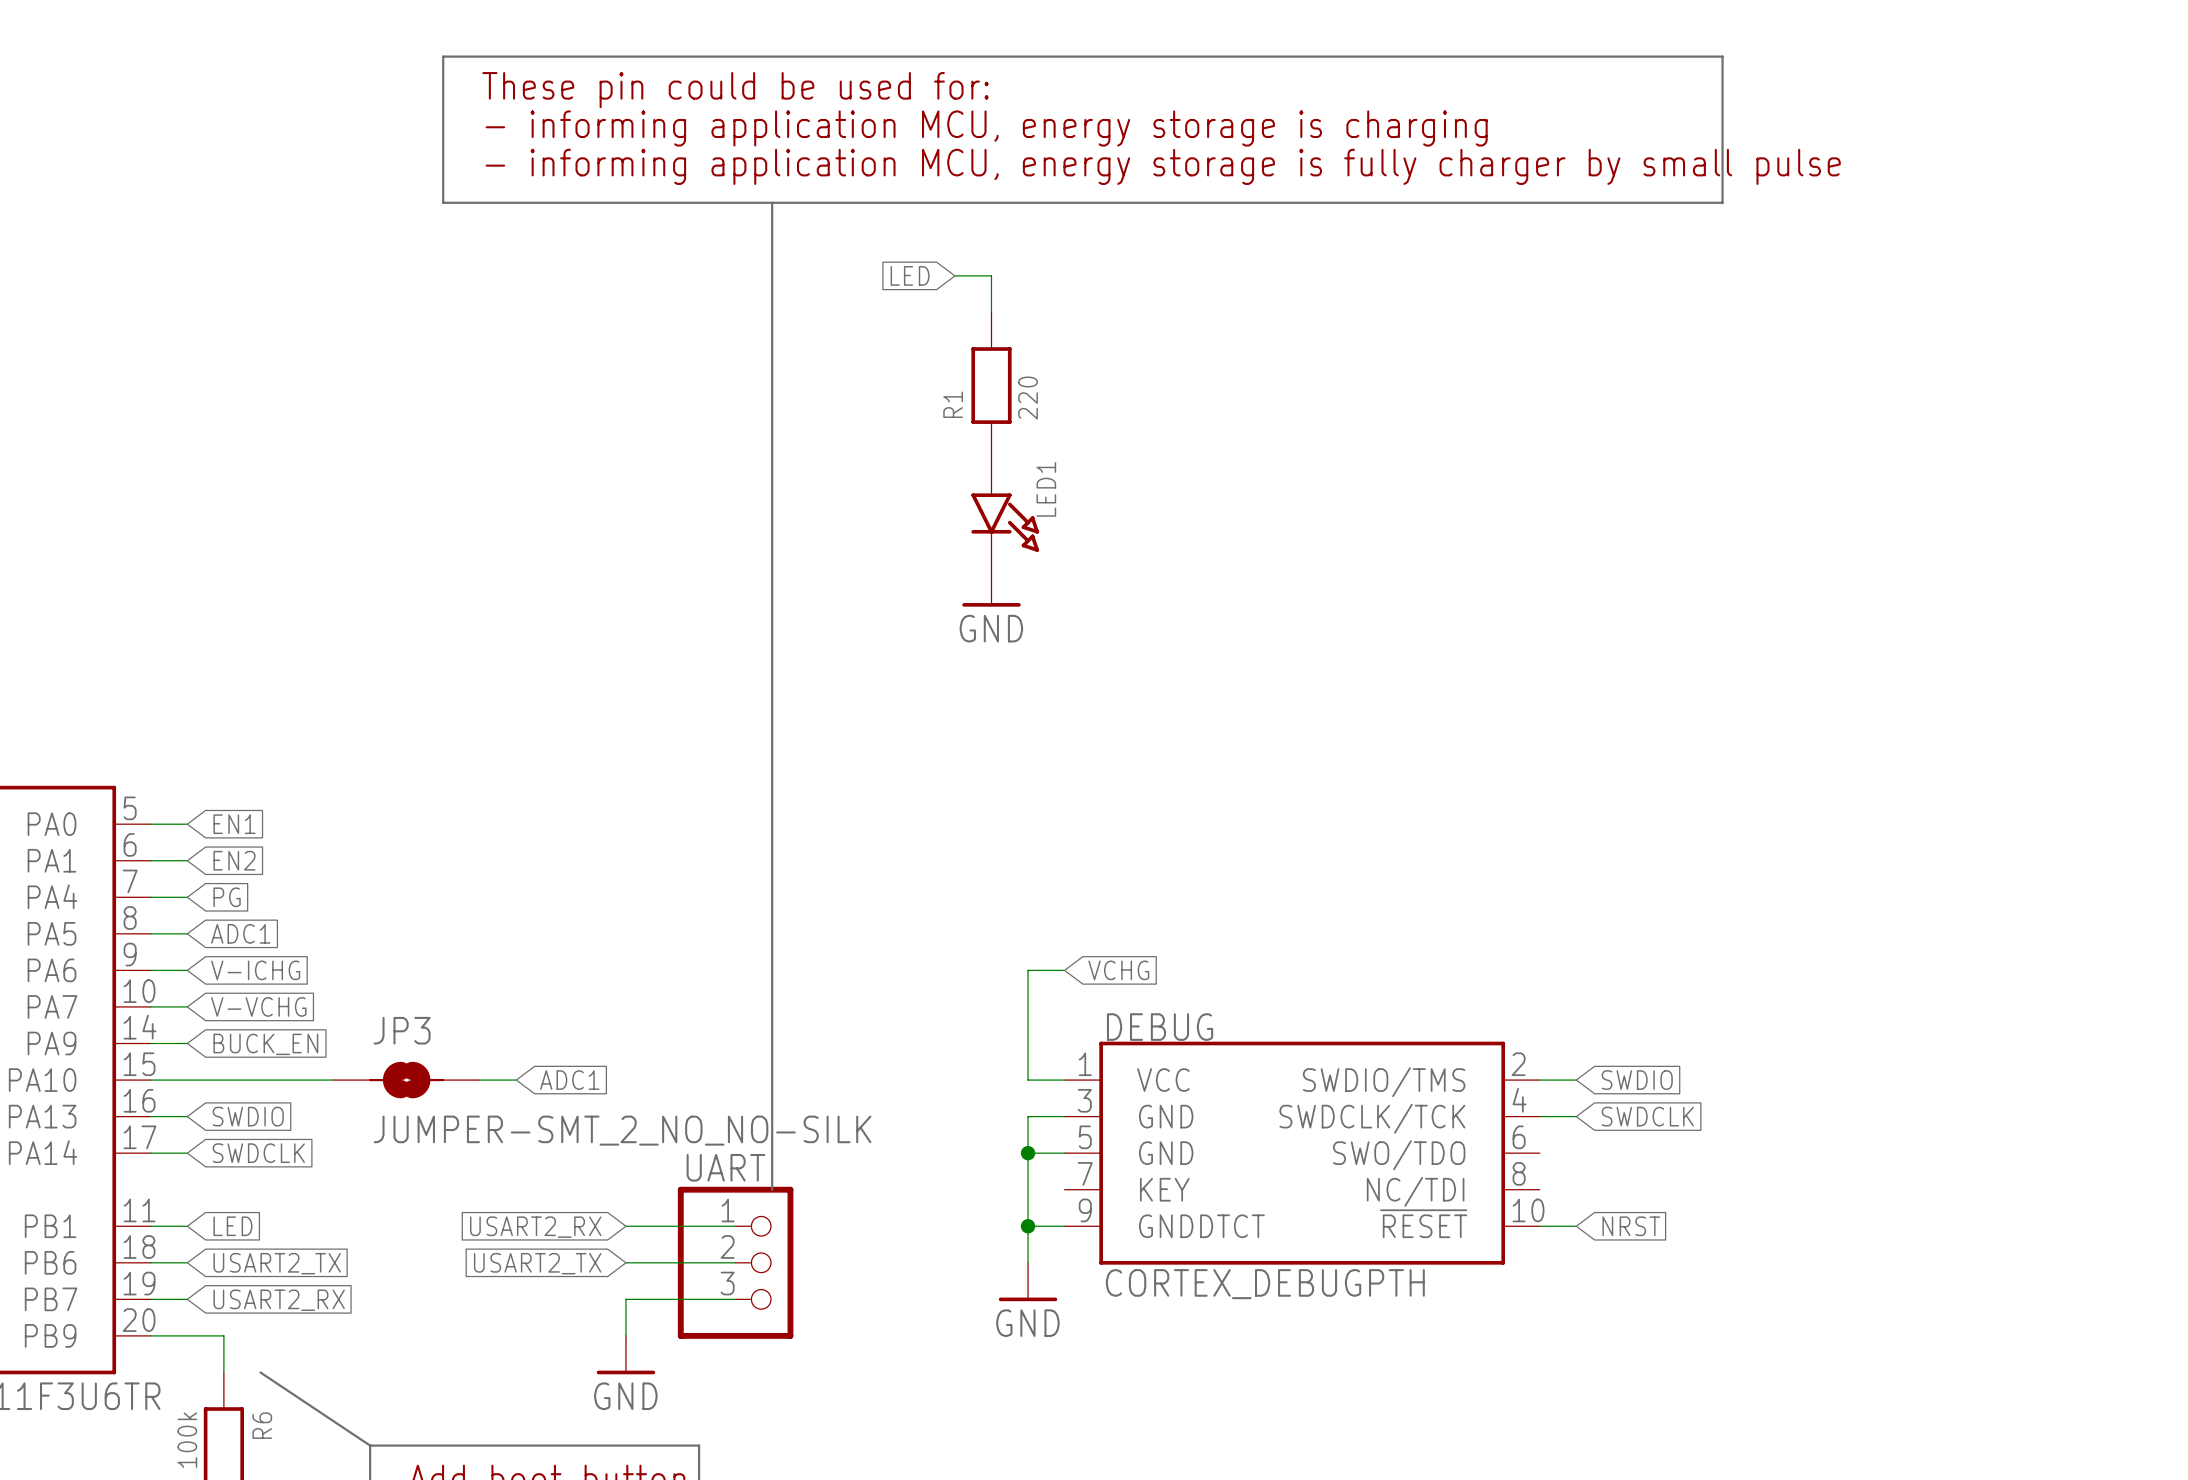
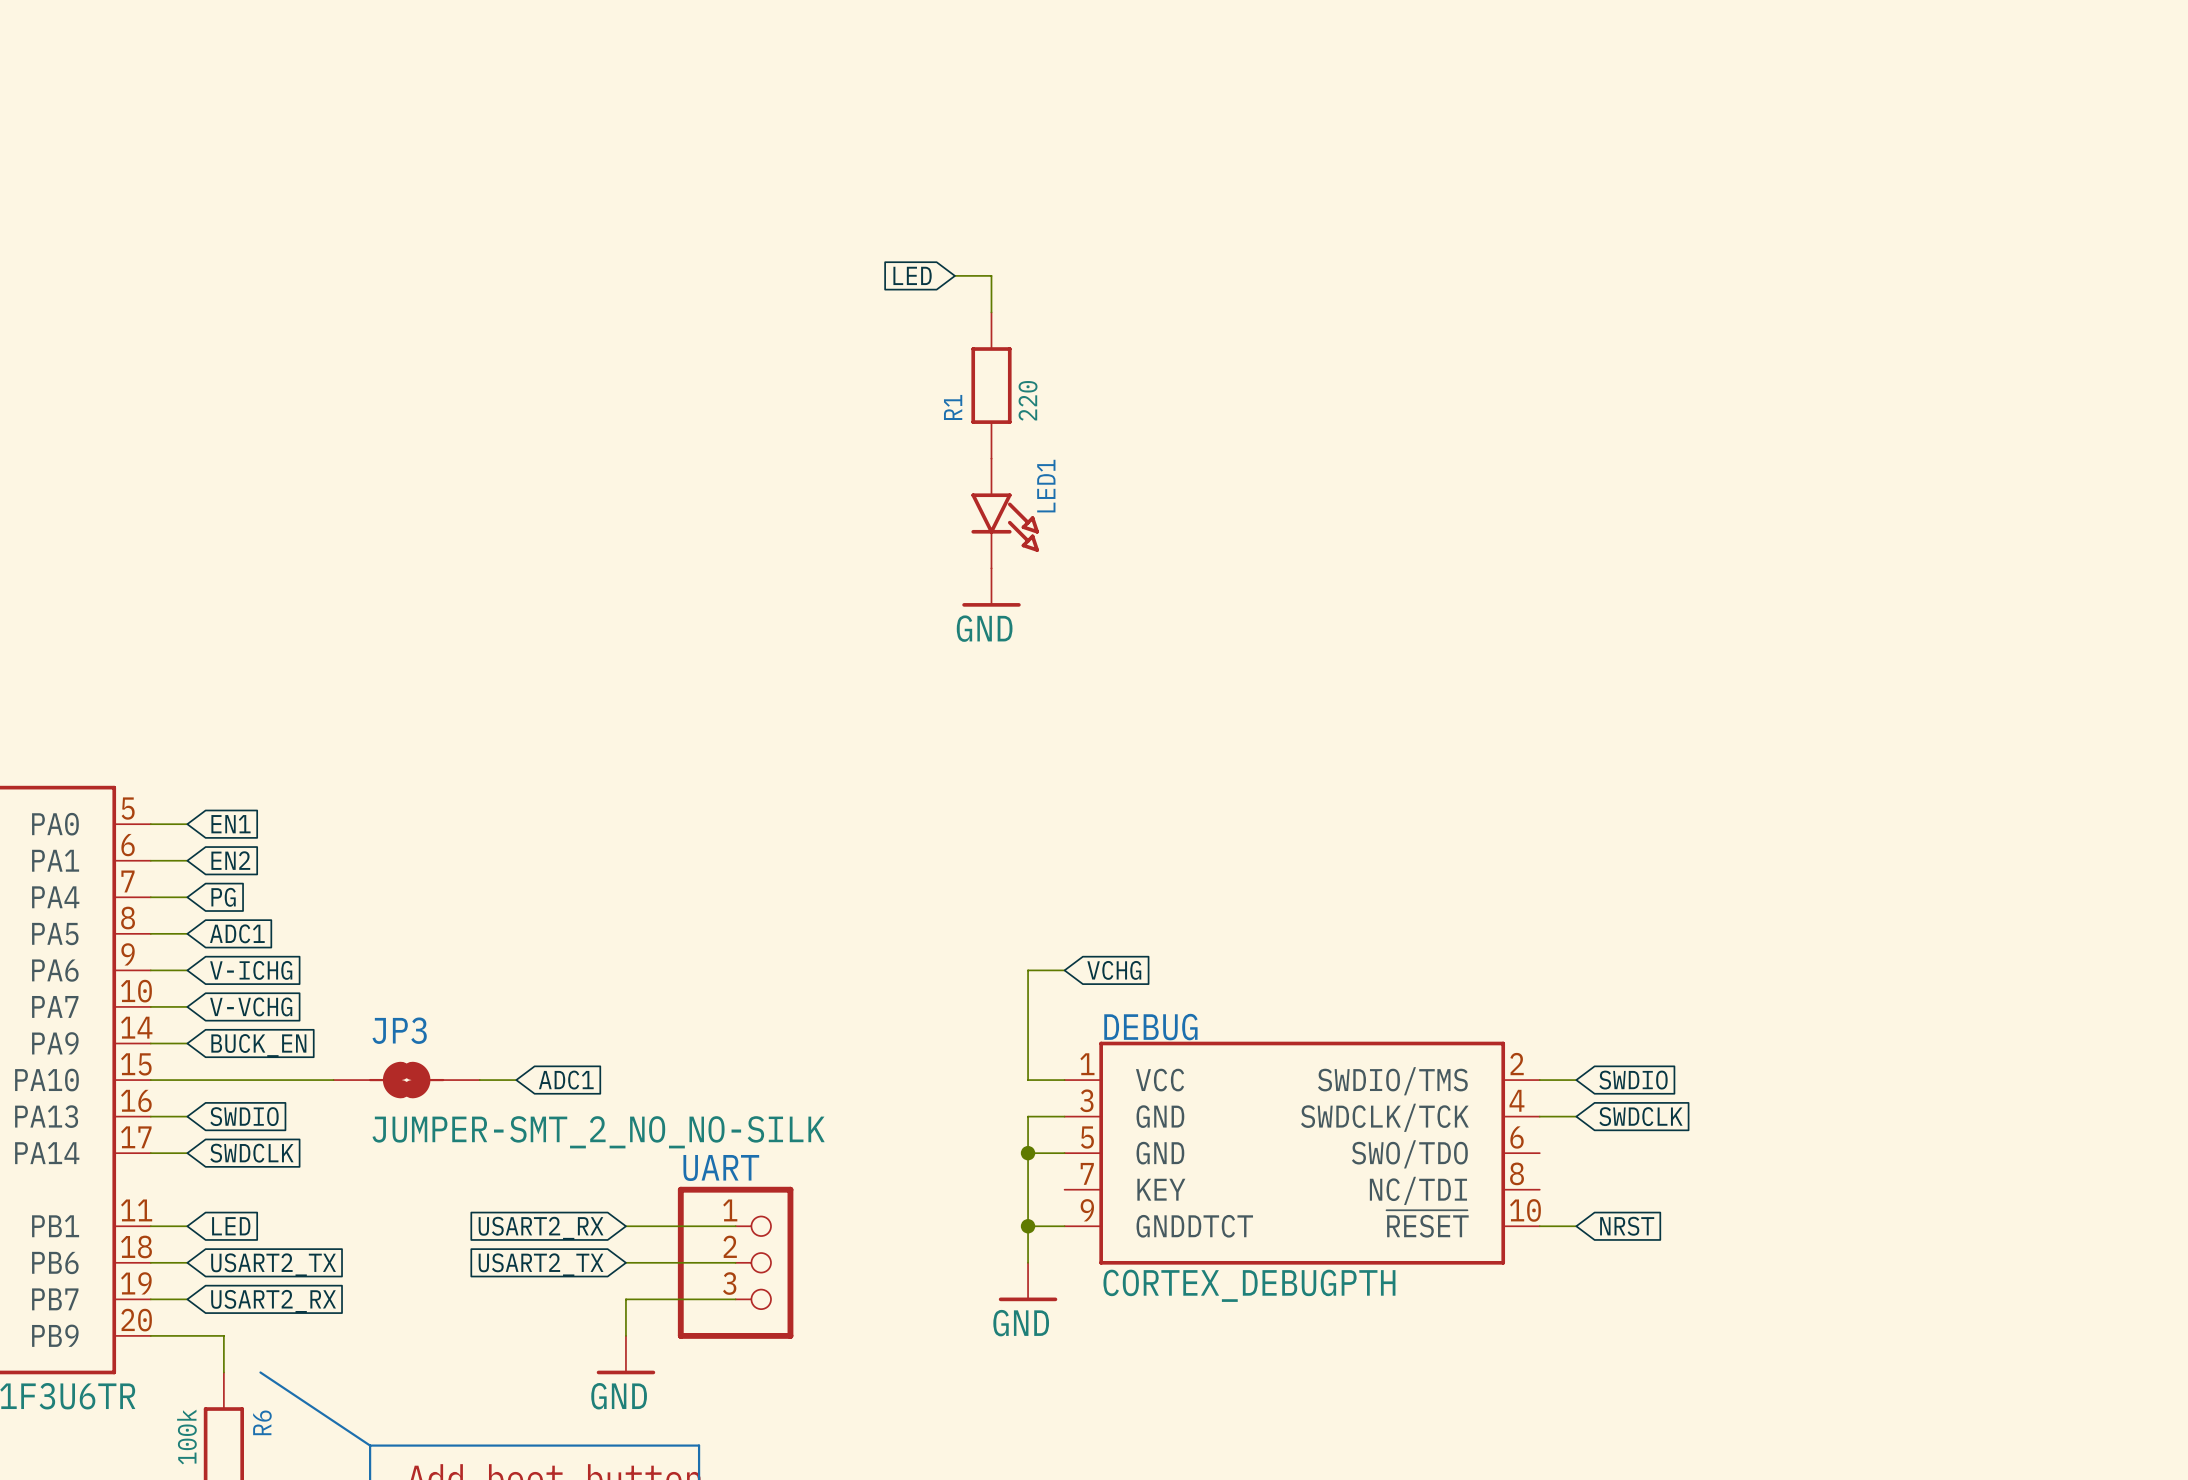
line: (443, 56) (443, 202) (1722, 202) (1722, 56) (443, 56) -> none
text: These pin could be used for: (735, 90) -> none
text: - informing application MCU, energy storage is charging (986, 128) -> none
text: - informing application MCU, energy storage is fully charger by small pulse (1163, 166) -> none
line: (772, 202) (772, 1189) -> none

